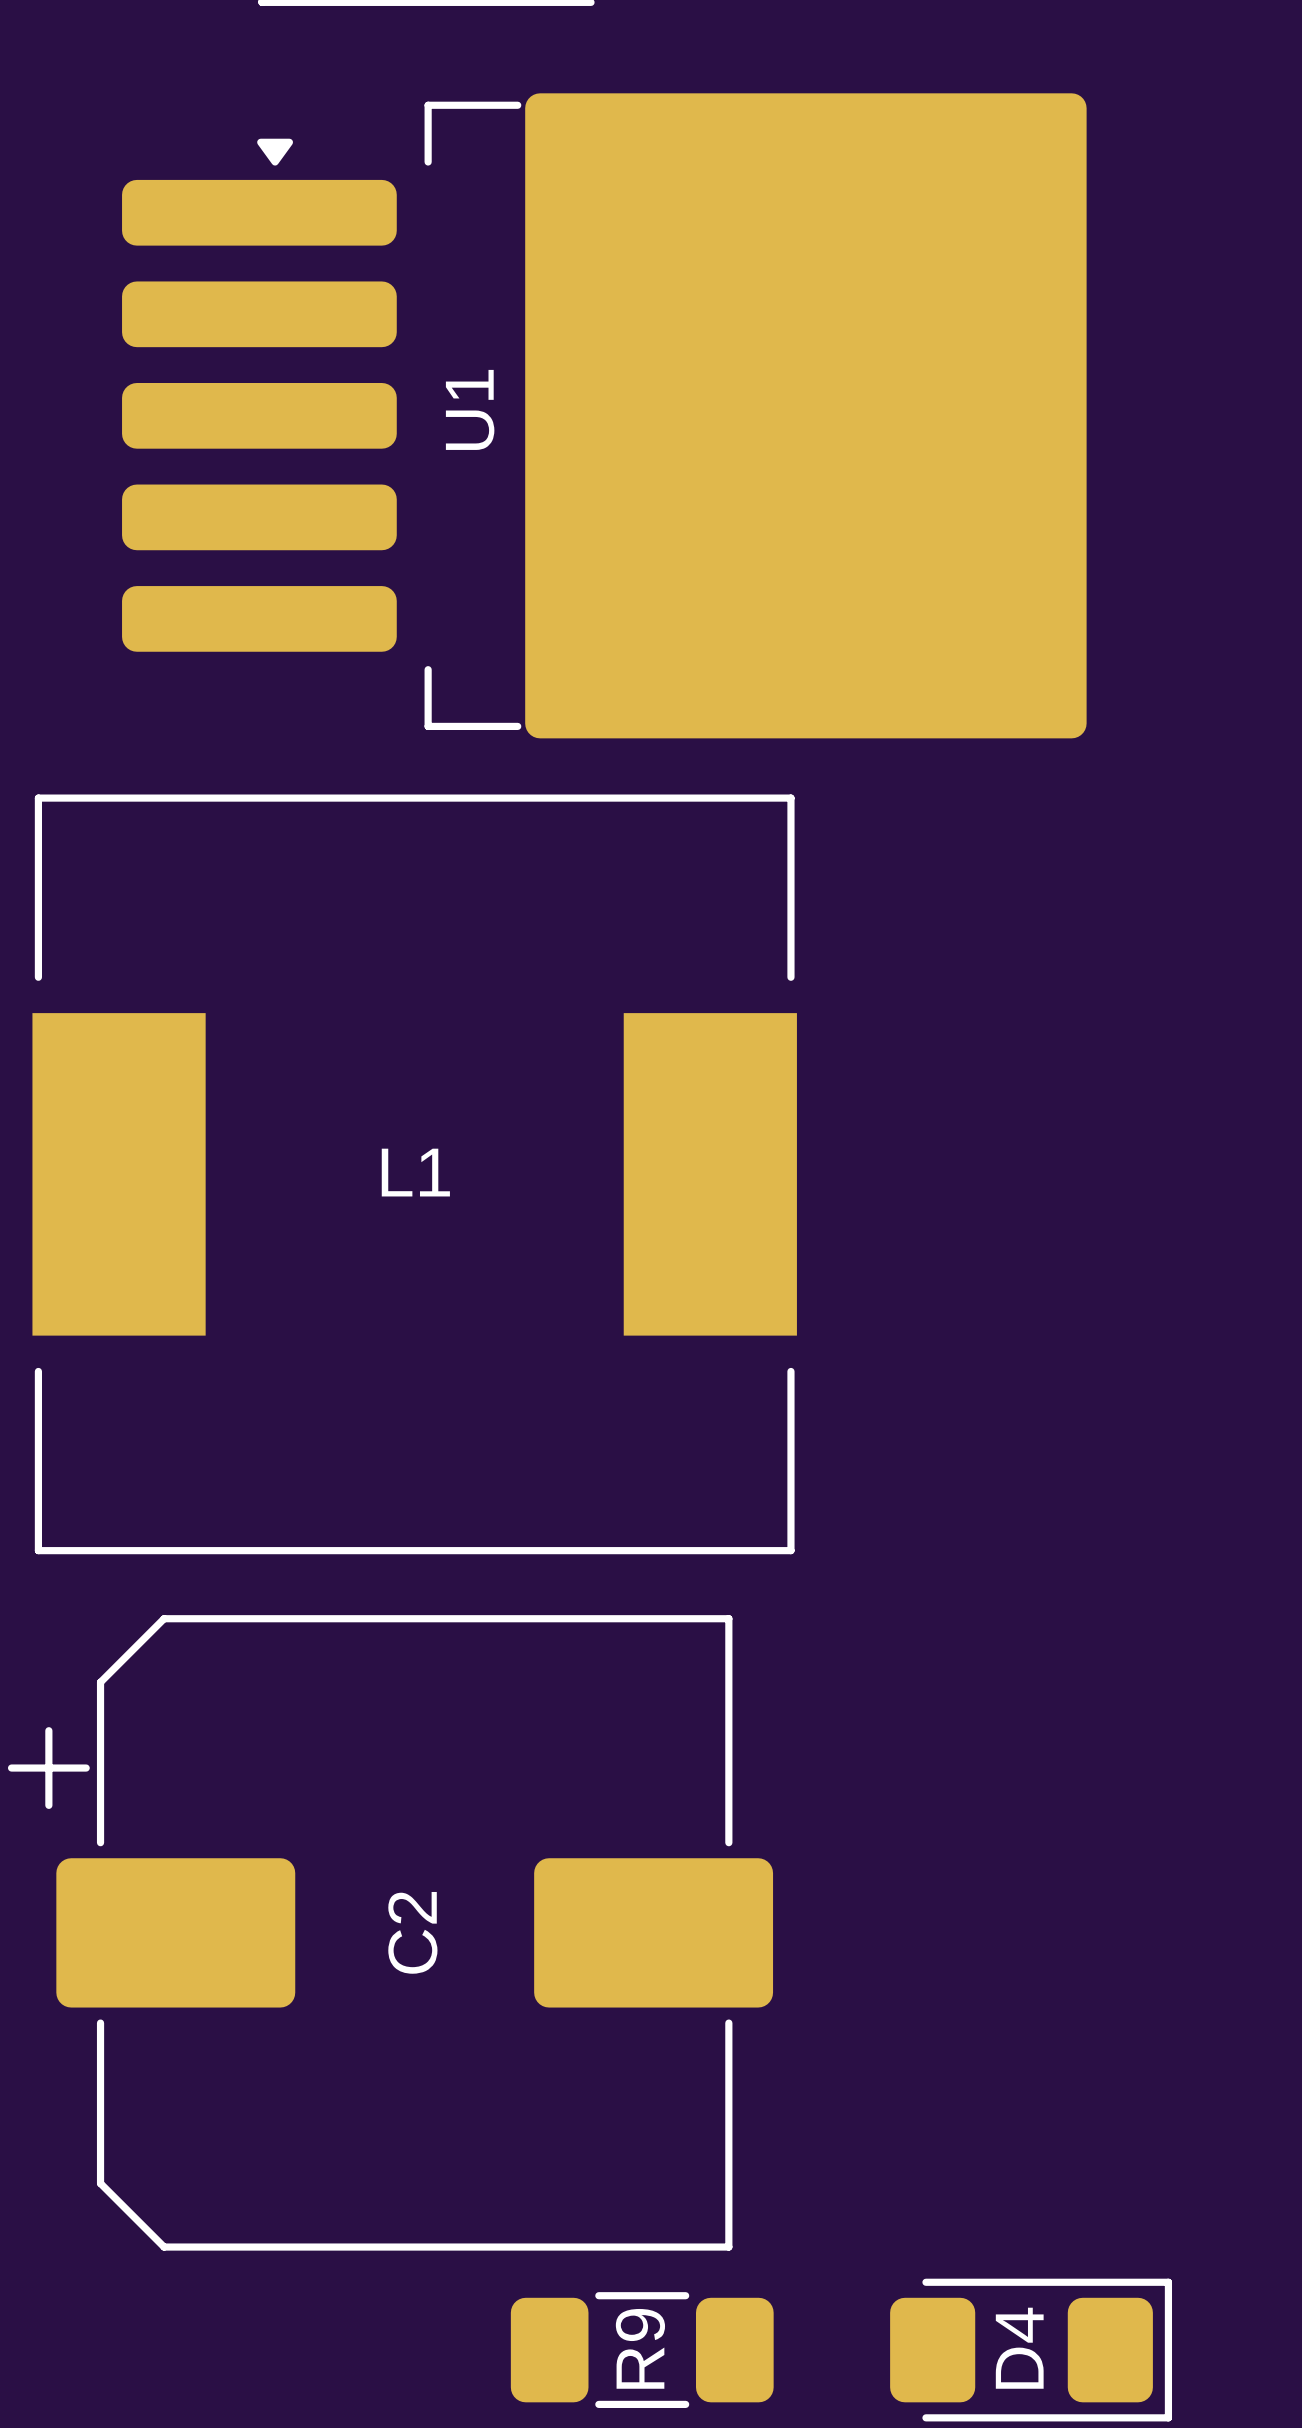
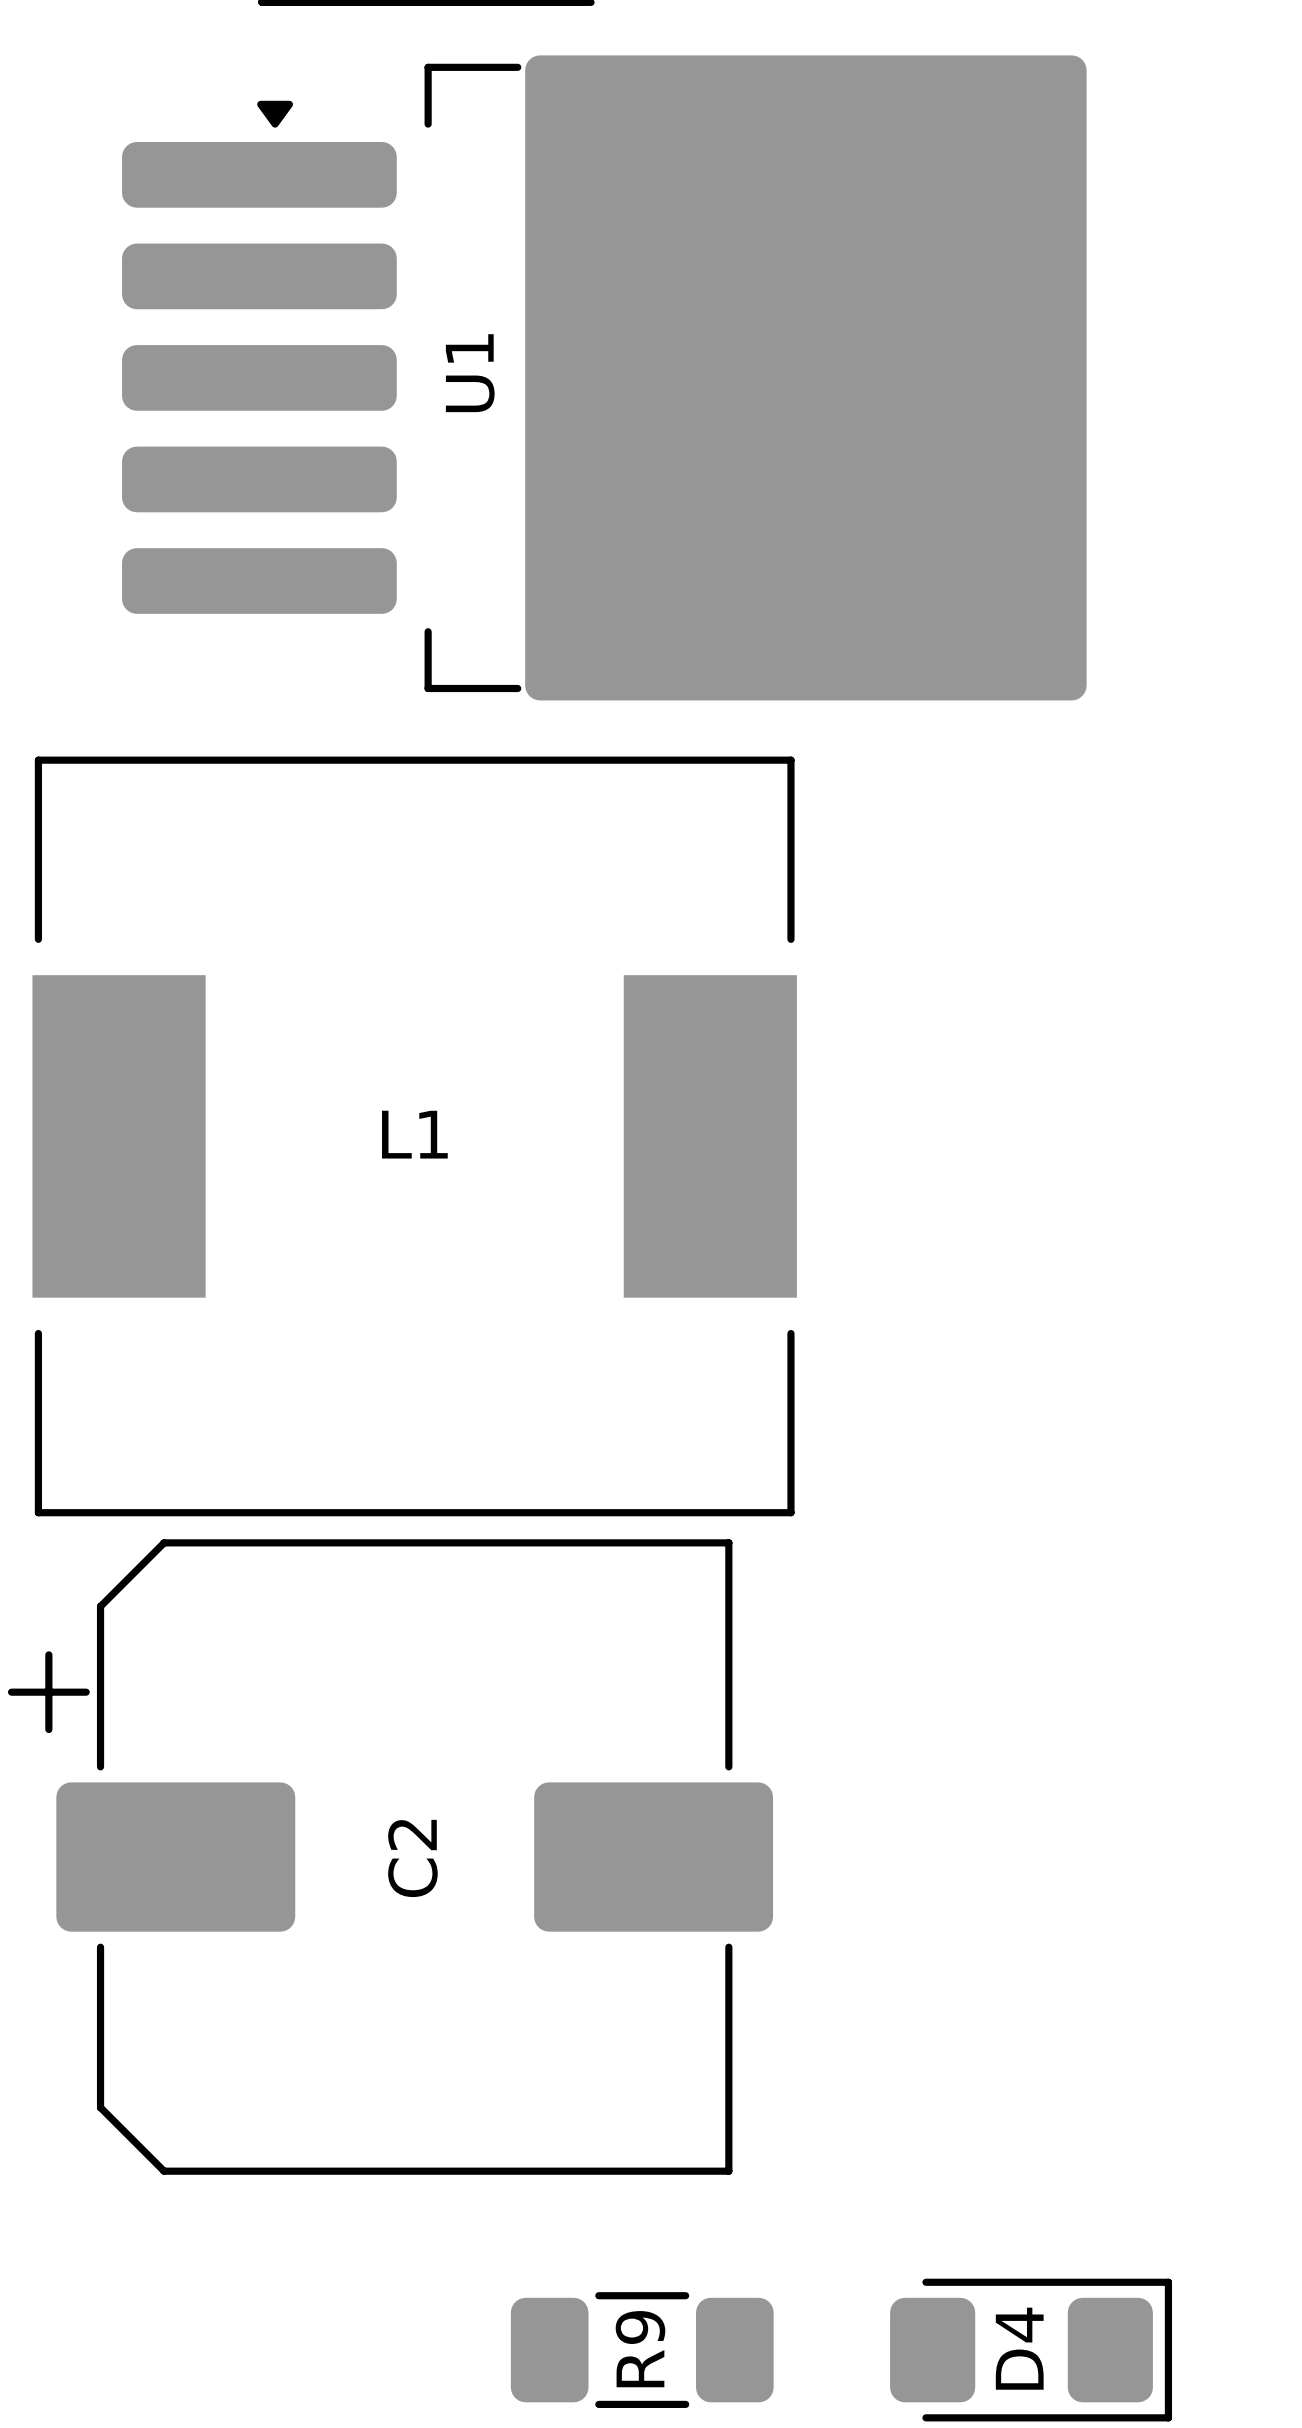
U1 position: (604, 415) -> (604, 377)
L1 position: (414, 1174) -> (414, 1136)
C2 position: (390, 1932) -> (390, 1857)

